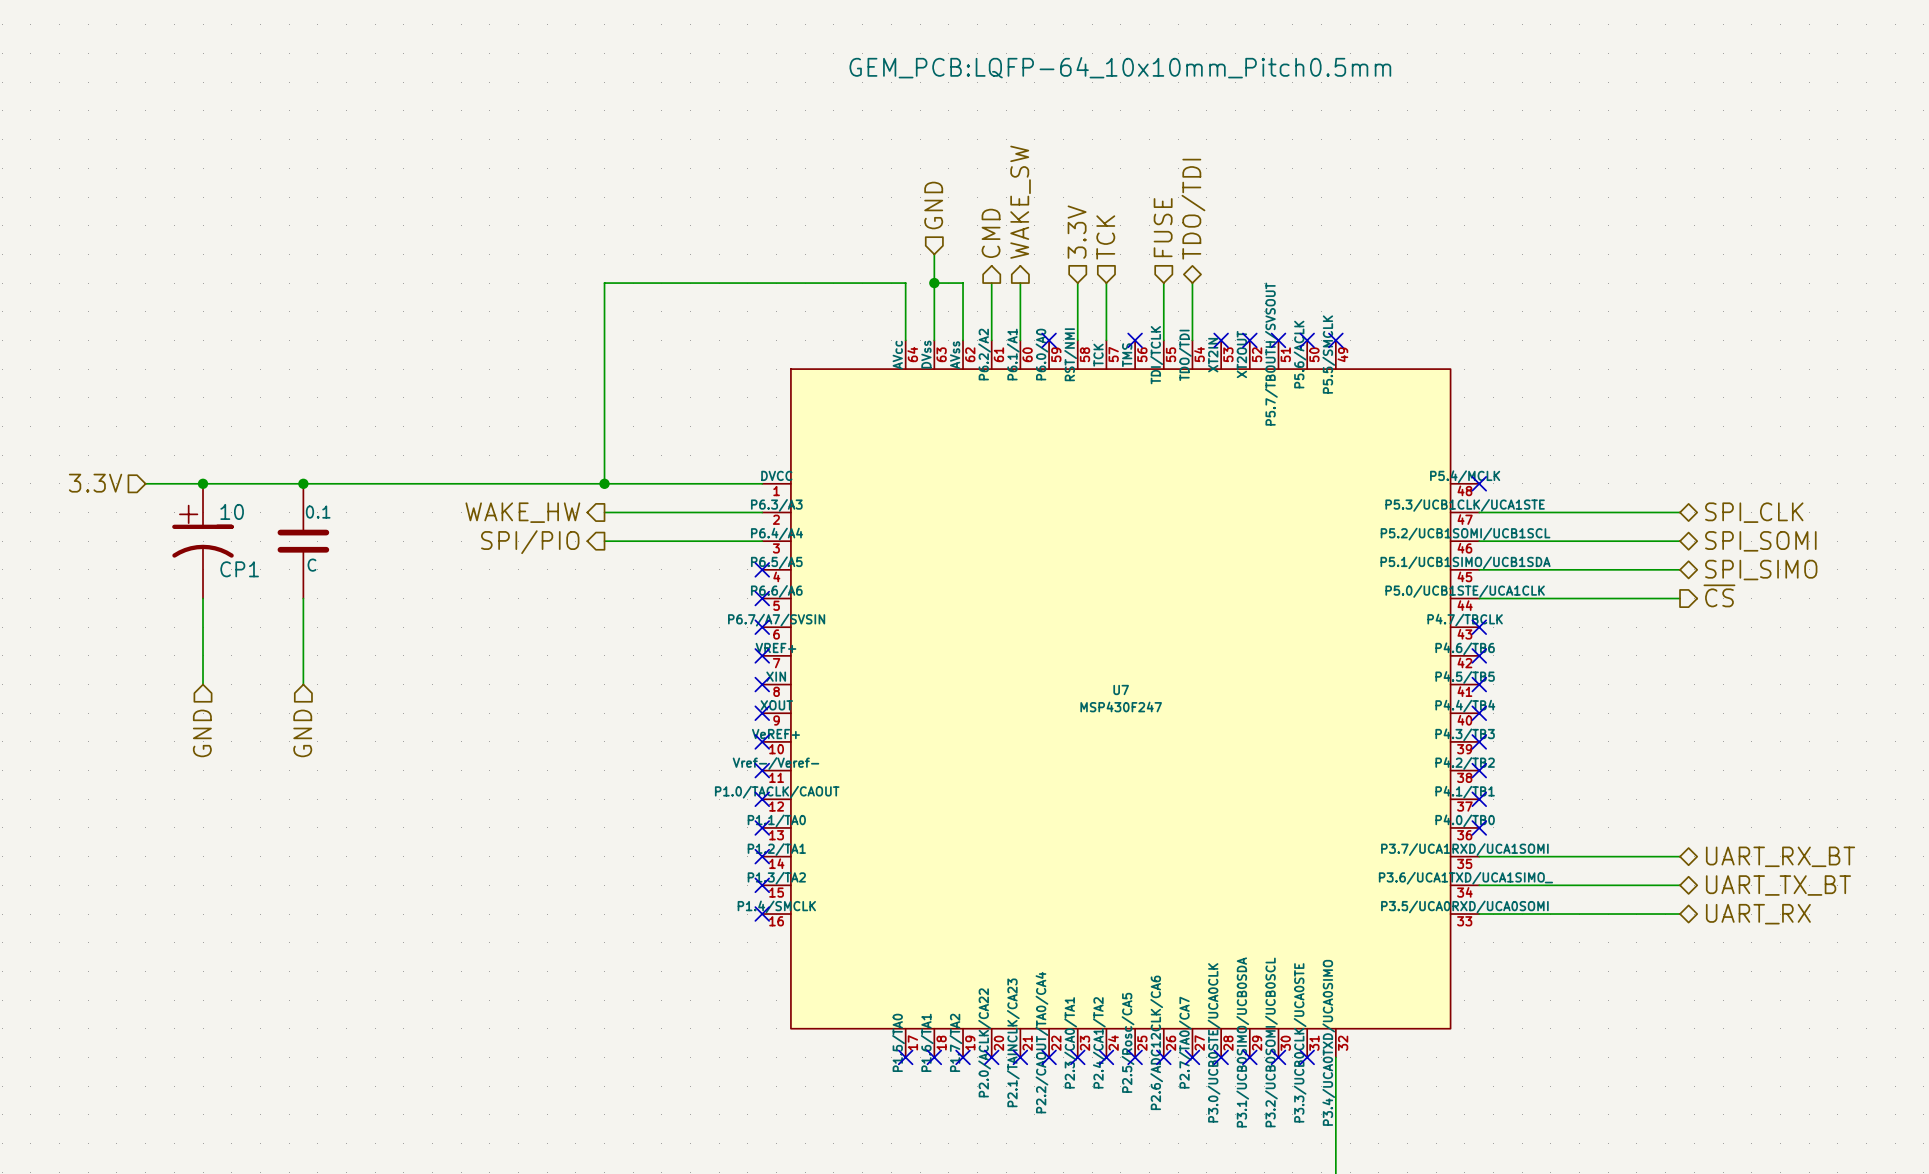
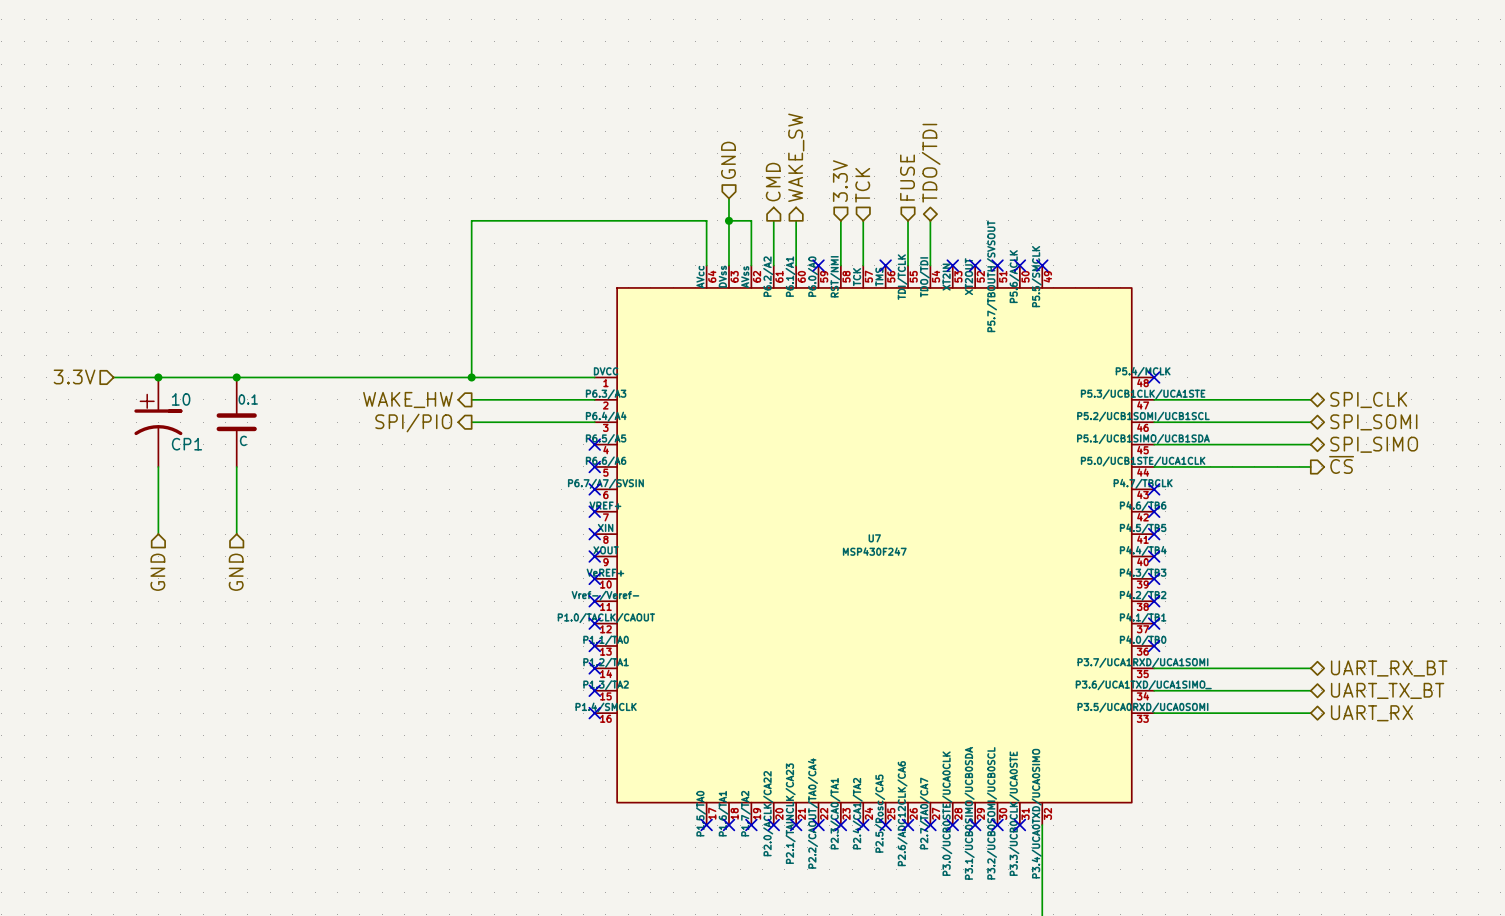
U7 text: GEM_PCB:LQFP-64_10x10mm_Pitch0.5mm (1120, 67) -> none

